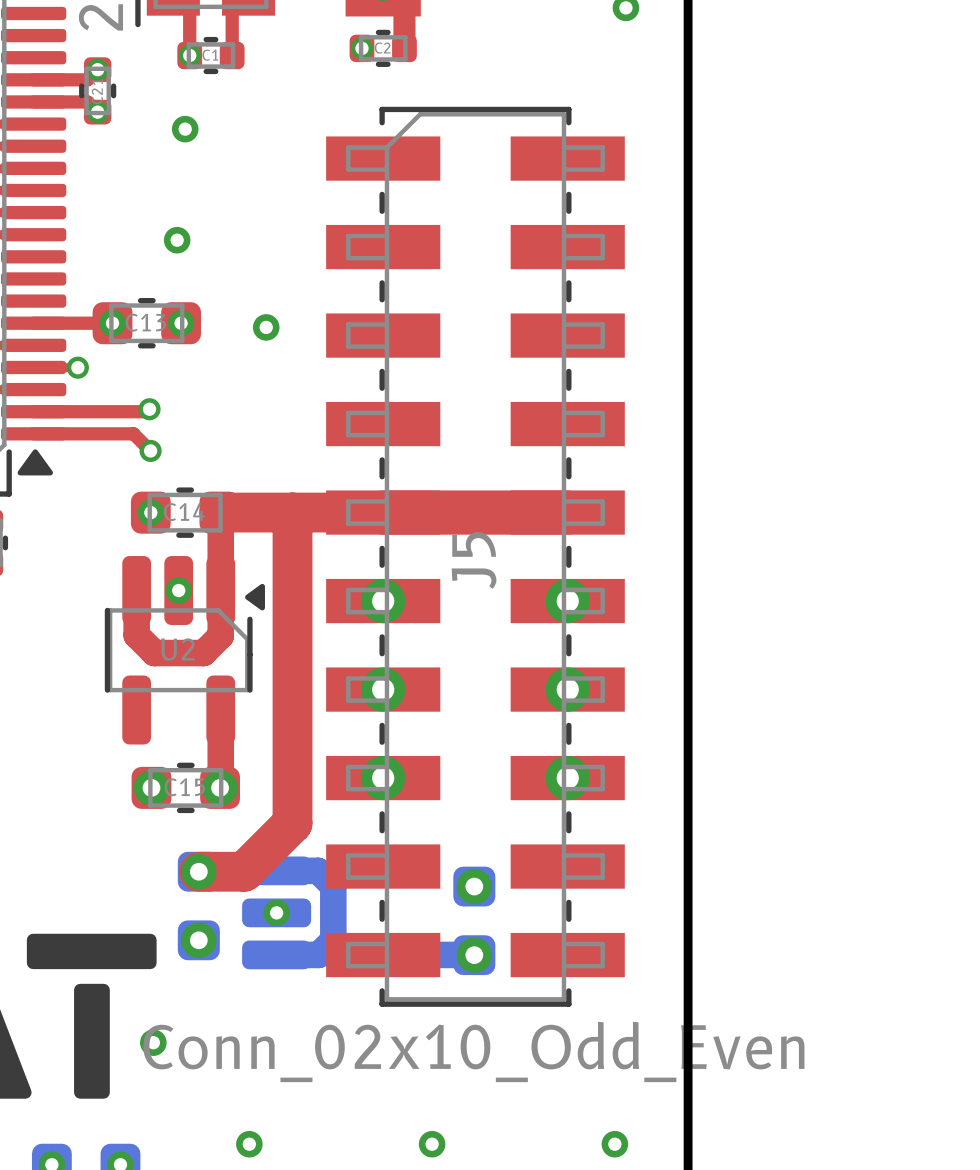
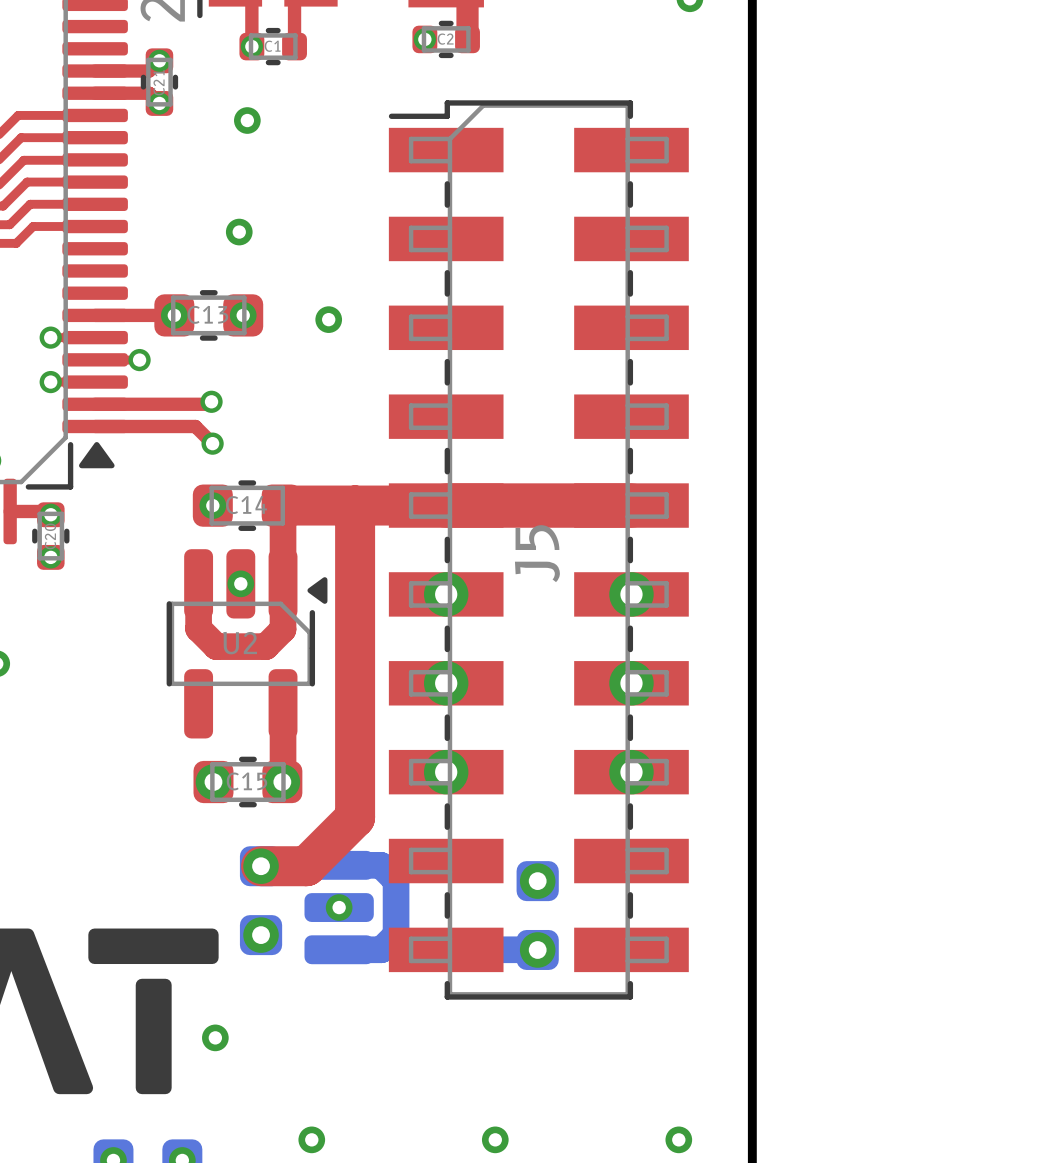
J5 footprint: [326, 106, 625, 1007] -> [388, 100, 689, 1000]
J5 value: Conn_02x10_Odd_Even (473, 1051) -> none

